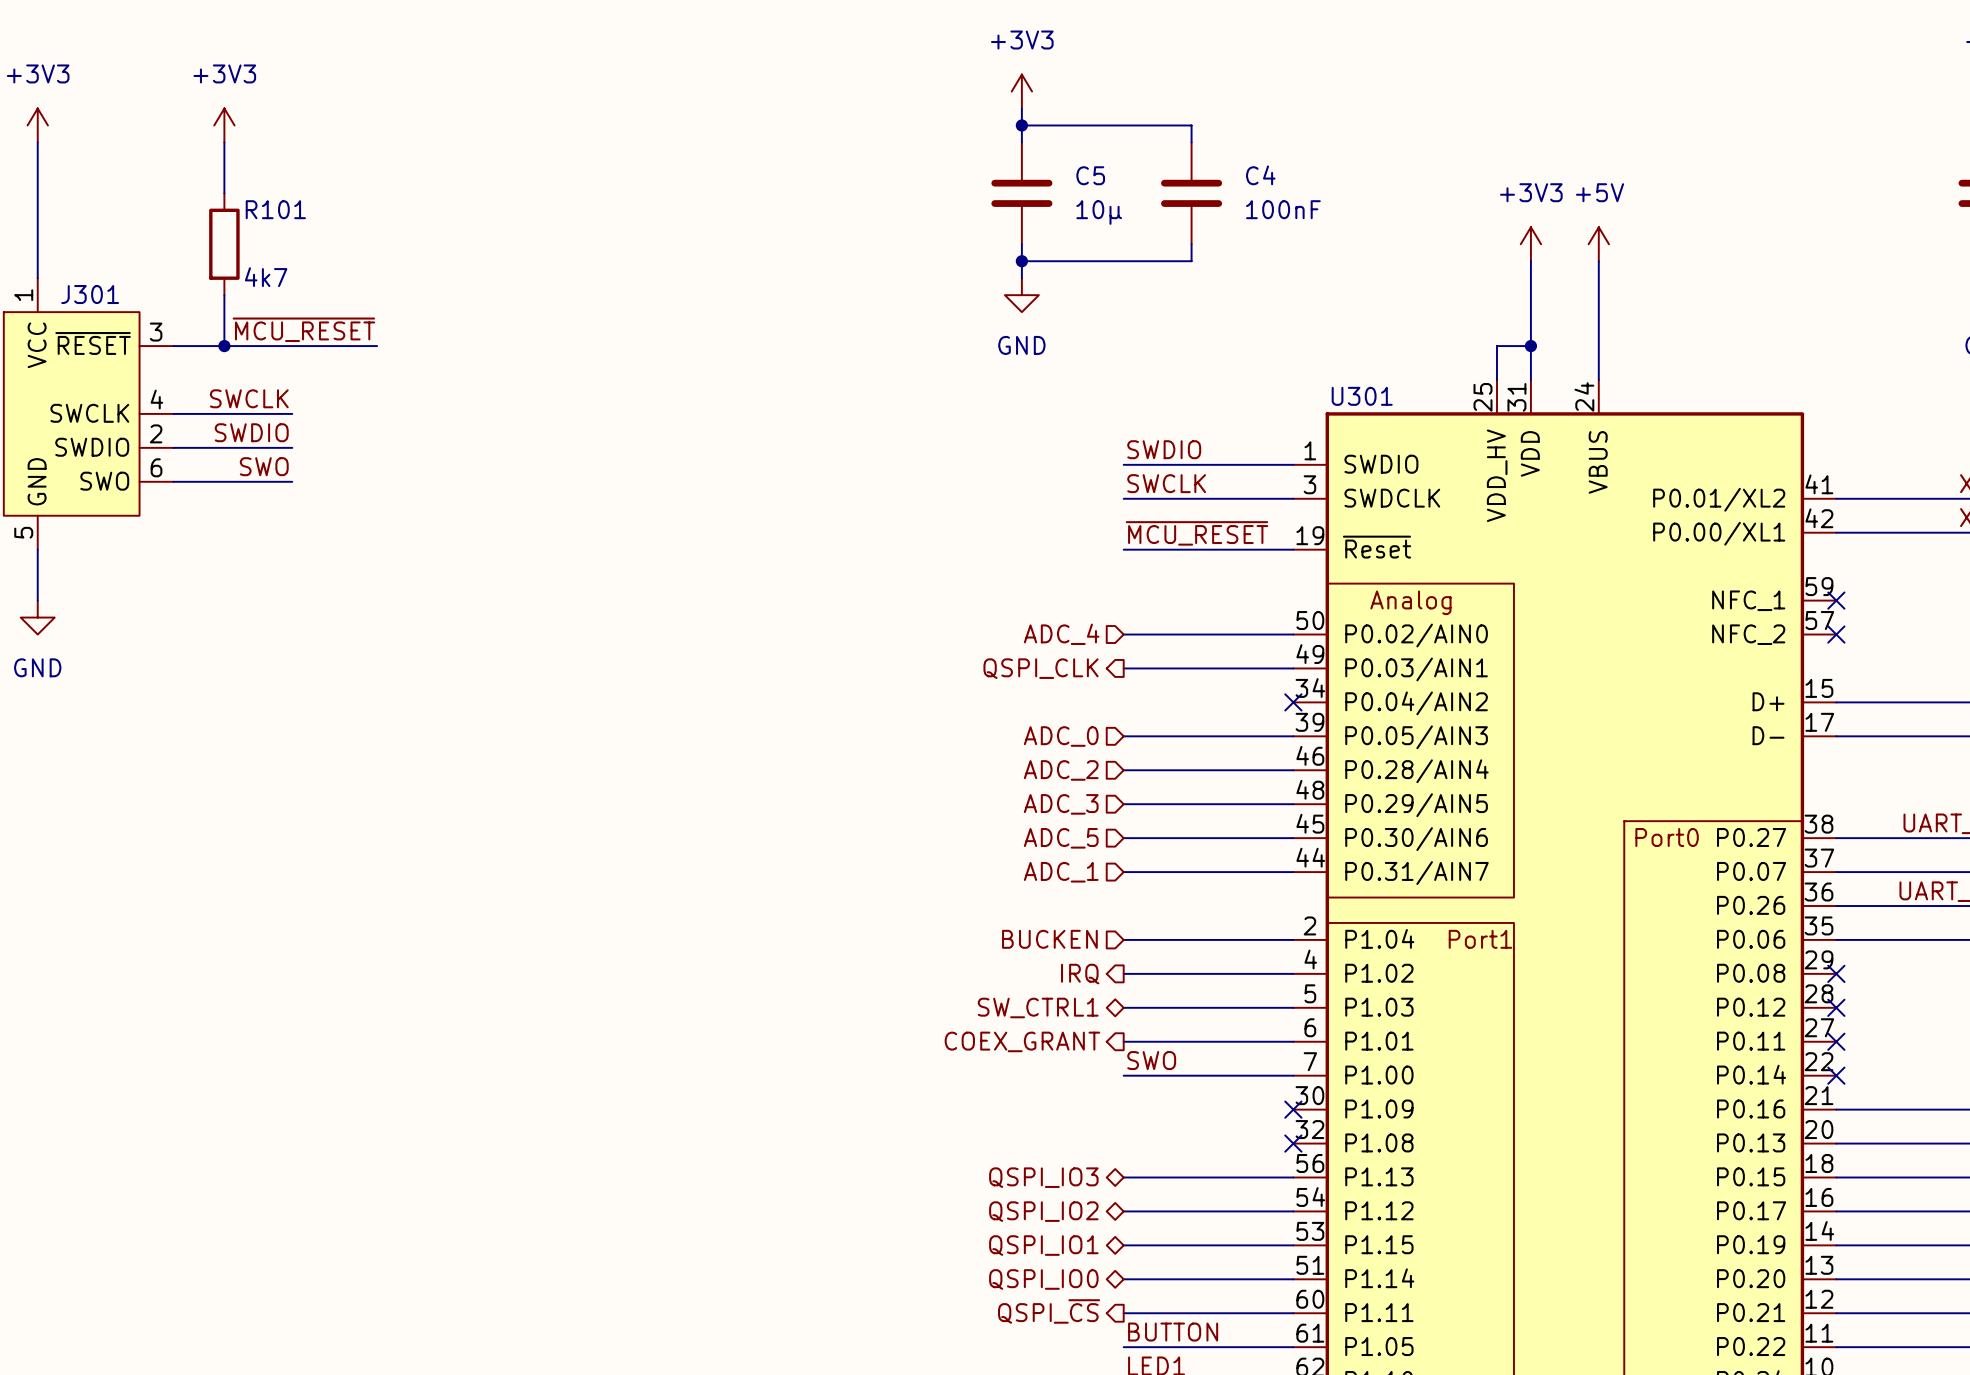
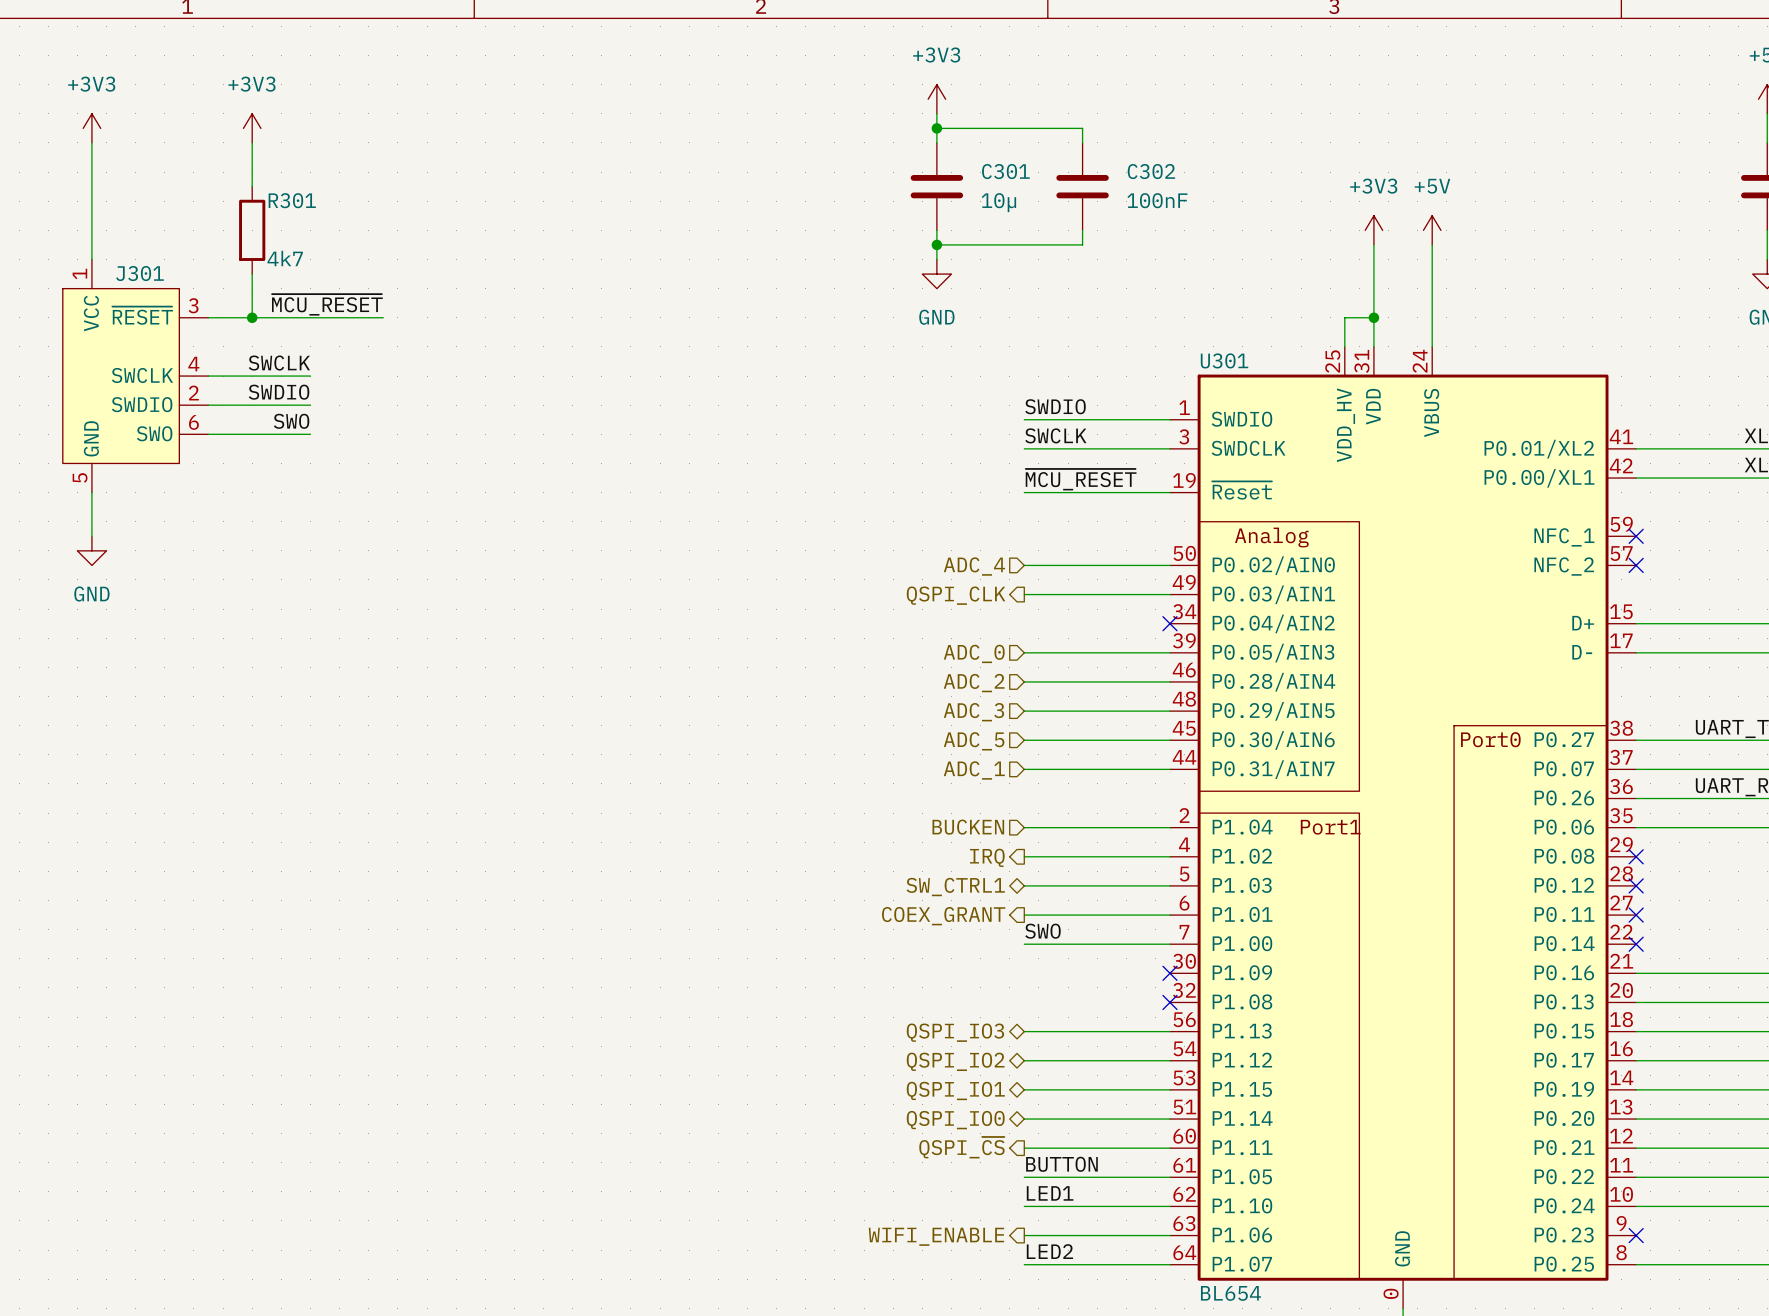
C5 name: C5 (1090, 175) -> C301 (1005, 171)
C4 name: C4 (1260, 175) -> C302 (1151, 171)
R101 name: R101 (275, 209) -> R301 (292, 200)

